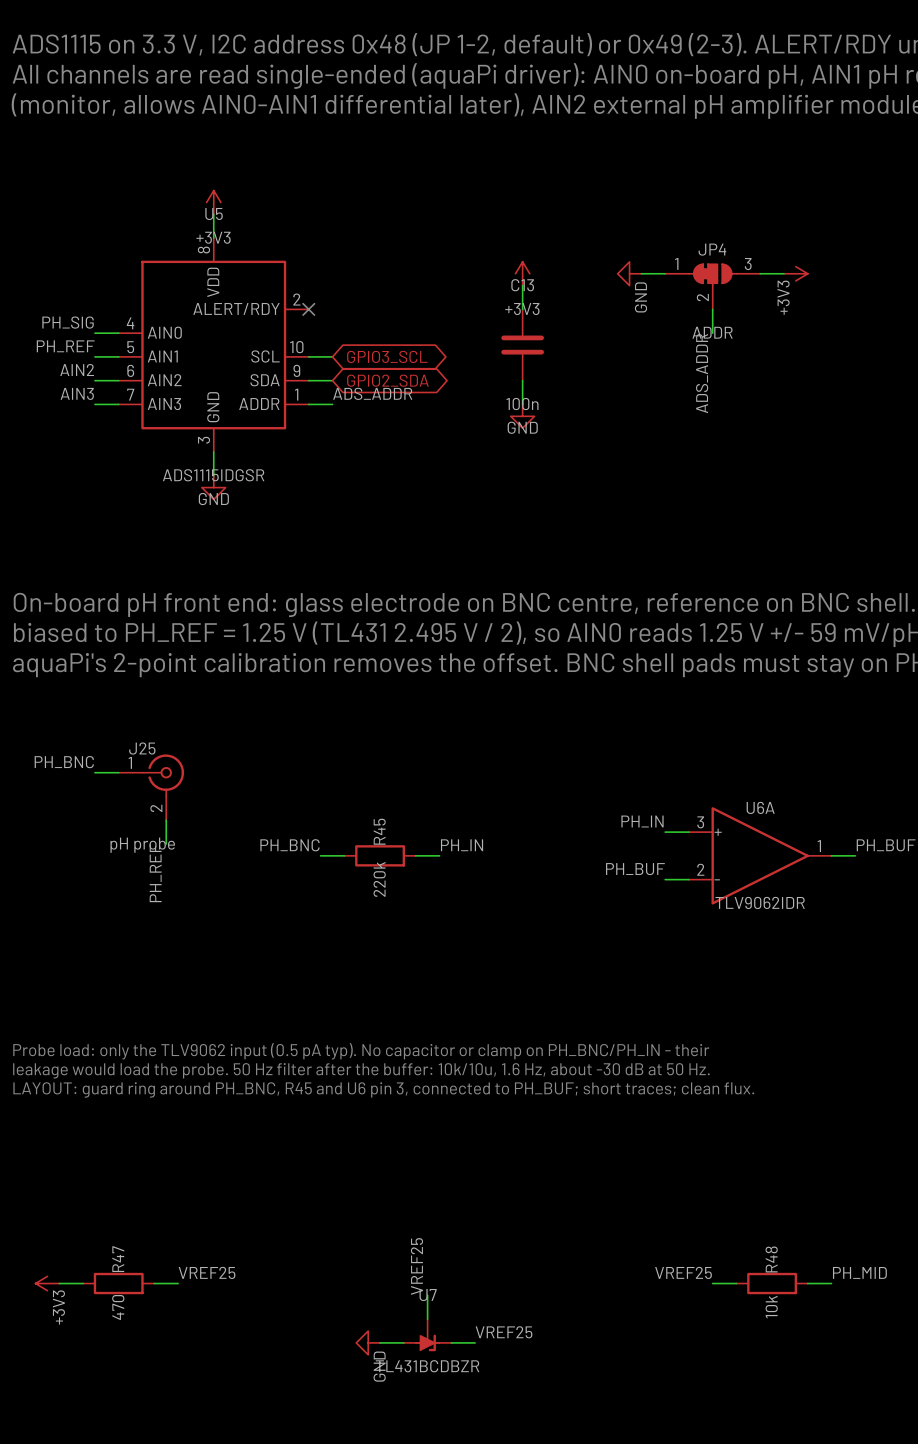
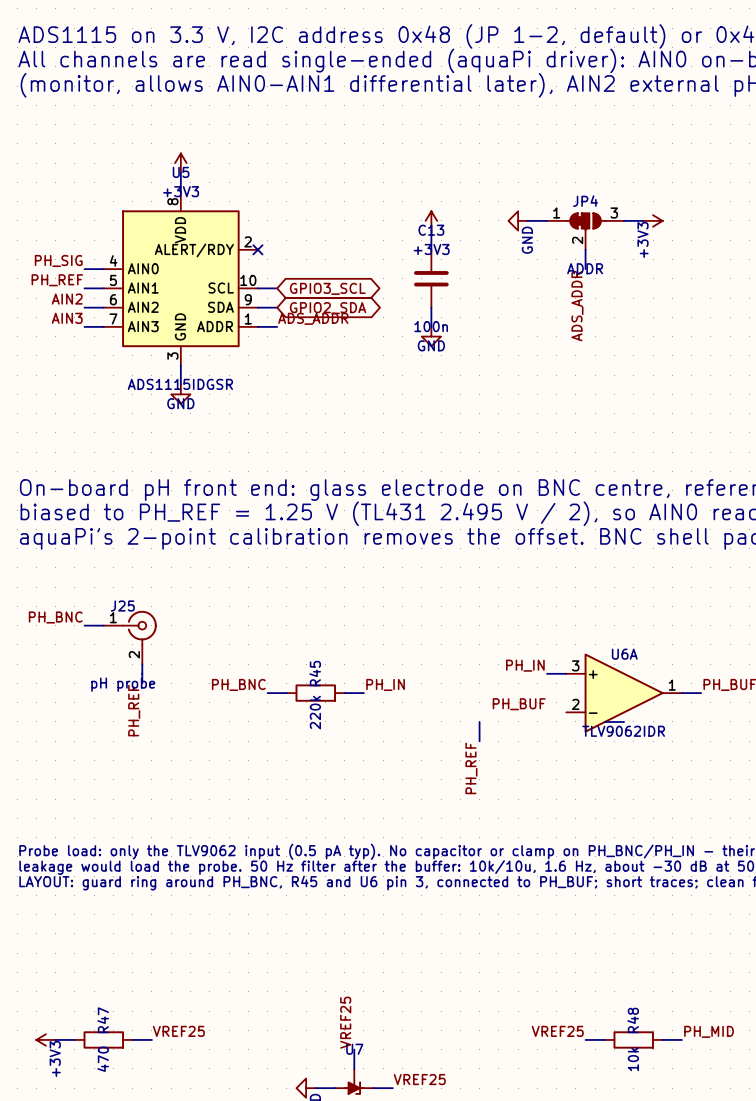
wire: (665, 879) (688, 879) -> (604, 721) (624, 721)
wire: none -> (479, 721) (479, 741)
label: none -> PH_REF (471, 768)

